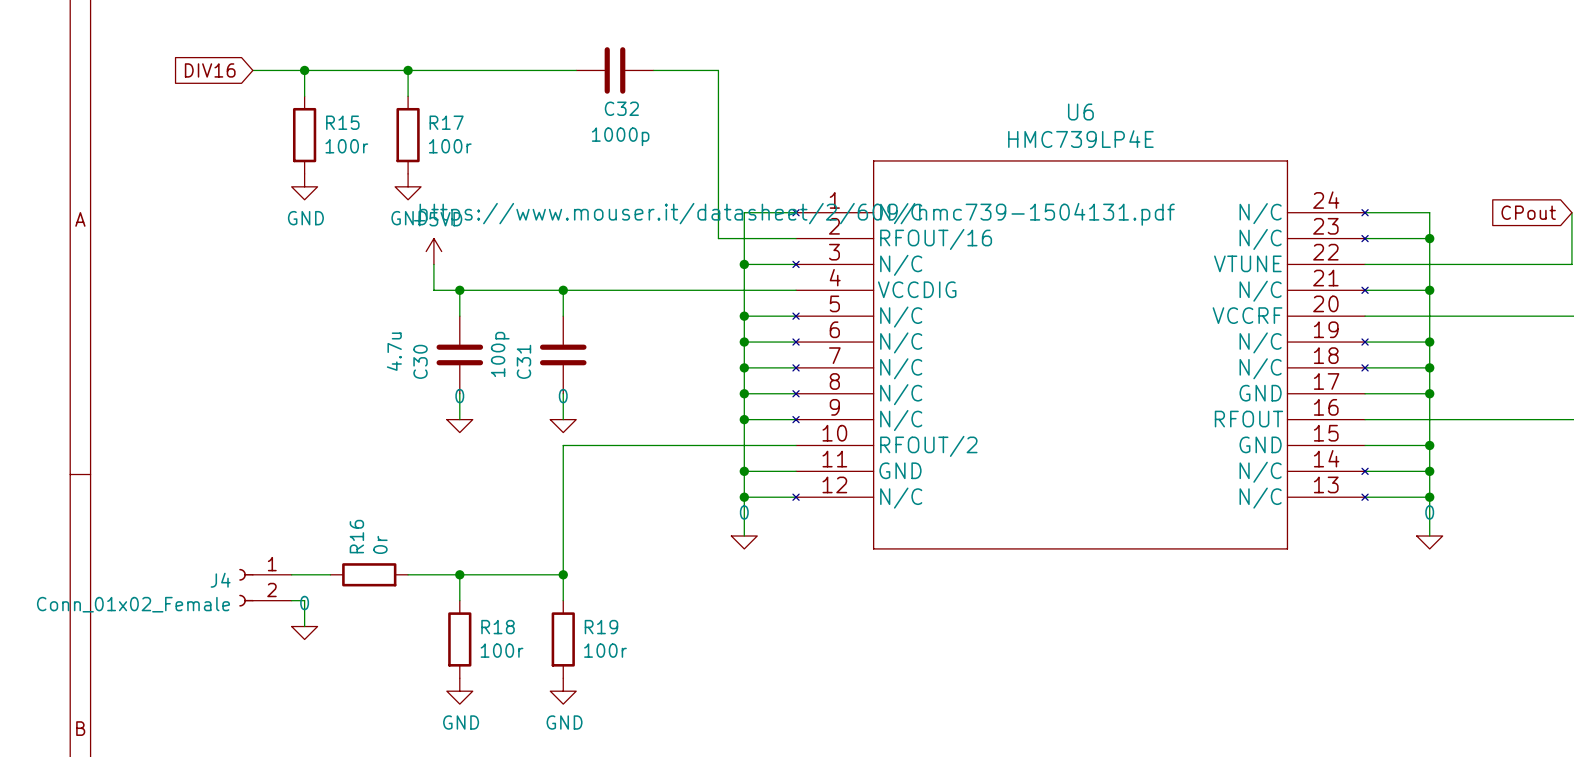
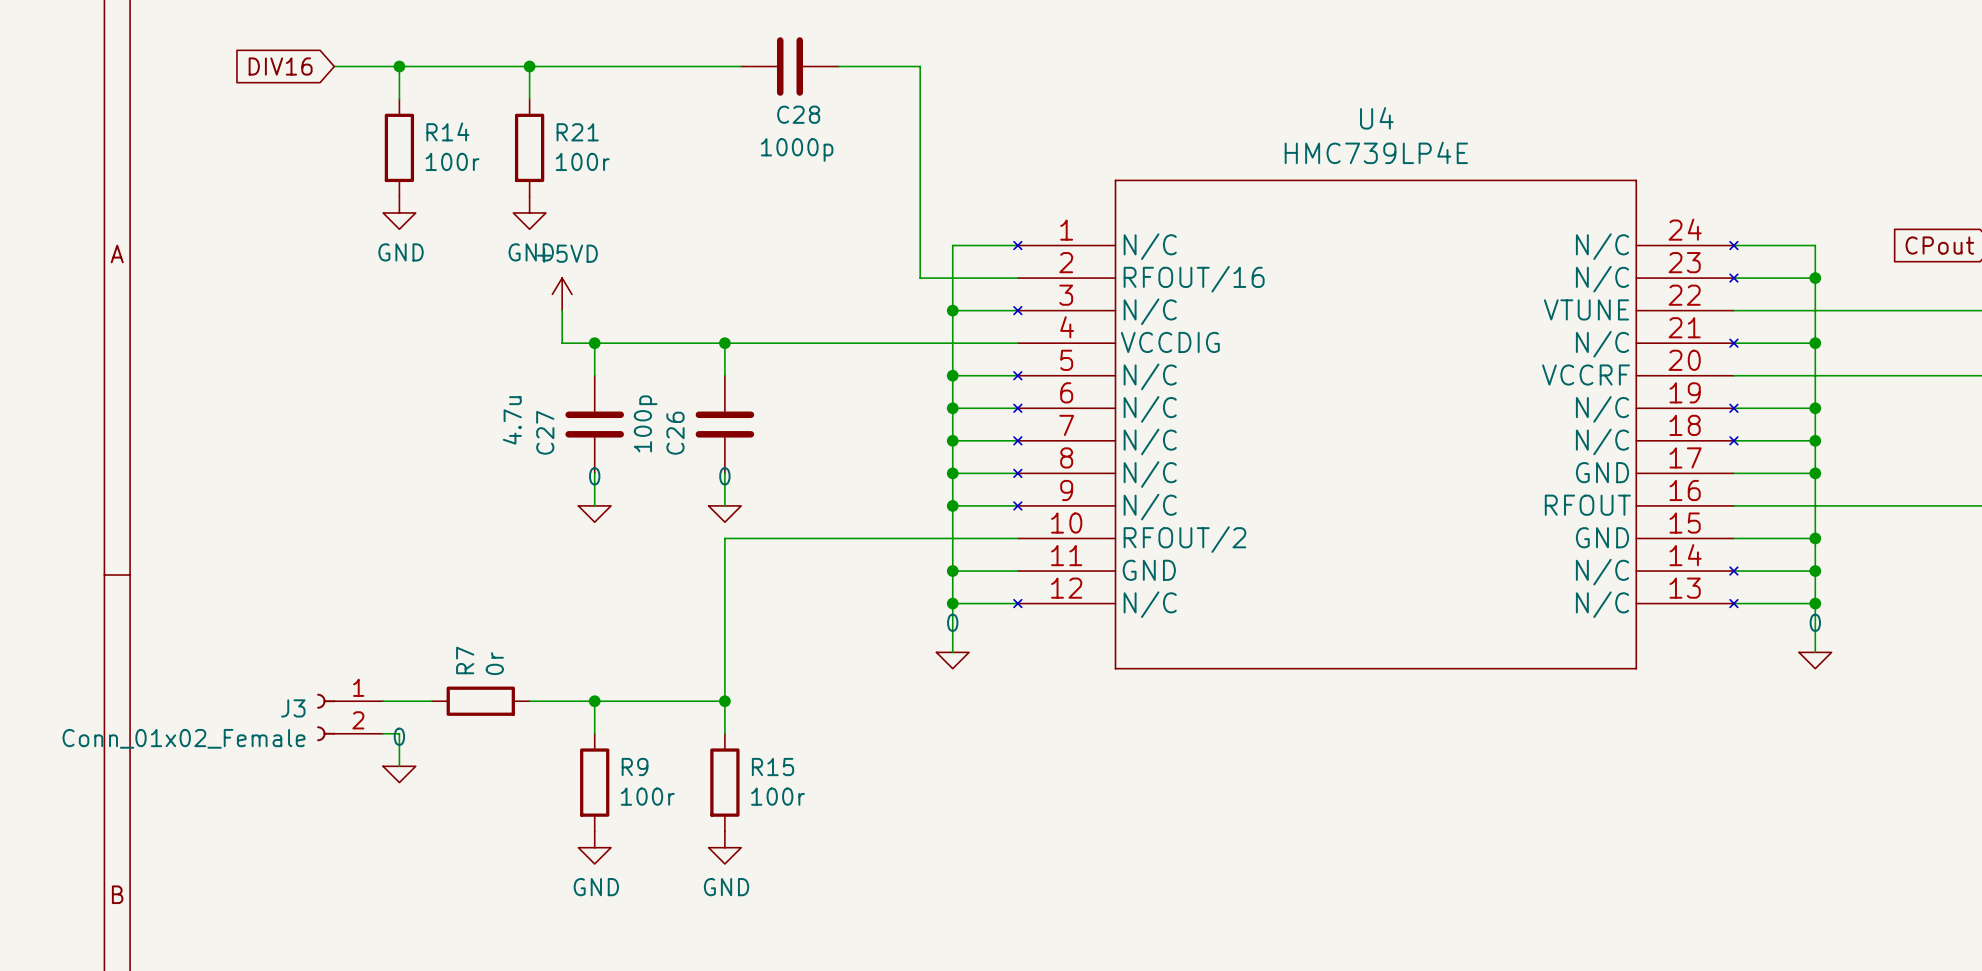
C32 name: C32 (621, 108) -> C28 (798, 114)
U6 name: U6 (1080, 112) -> U4 (1376, 118)
R15 name: R15 (342, 122) -> R14 (447, 131)
R17 name: R17 (446, 122) -> R21 (577, 132)
U6 text: https://www.mouser.it/datasheet/2/609/hmc739-1504131.pdf (797, 214) -> none
C30 name: C30 (420, 361) -> C27 (545, 432)
C31 name: C31 (523, 361) -> C26 (675, 433)
R16 name: R16 (356, 536) -> R7 (465, 660)
J4 name: J4 (220, 580) -> J3 (293, 708)
R18 name: R18 (498, 627) -> R9 (635, 767)
R19 name: R19 (601, 627) -> R15 (773, 767)

